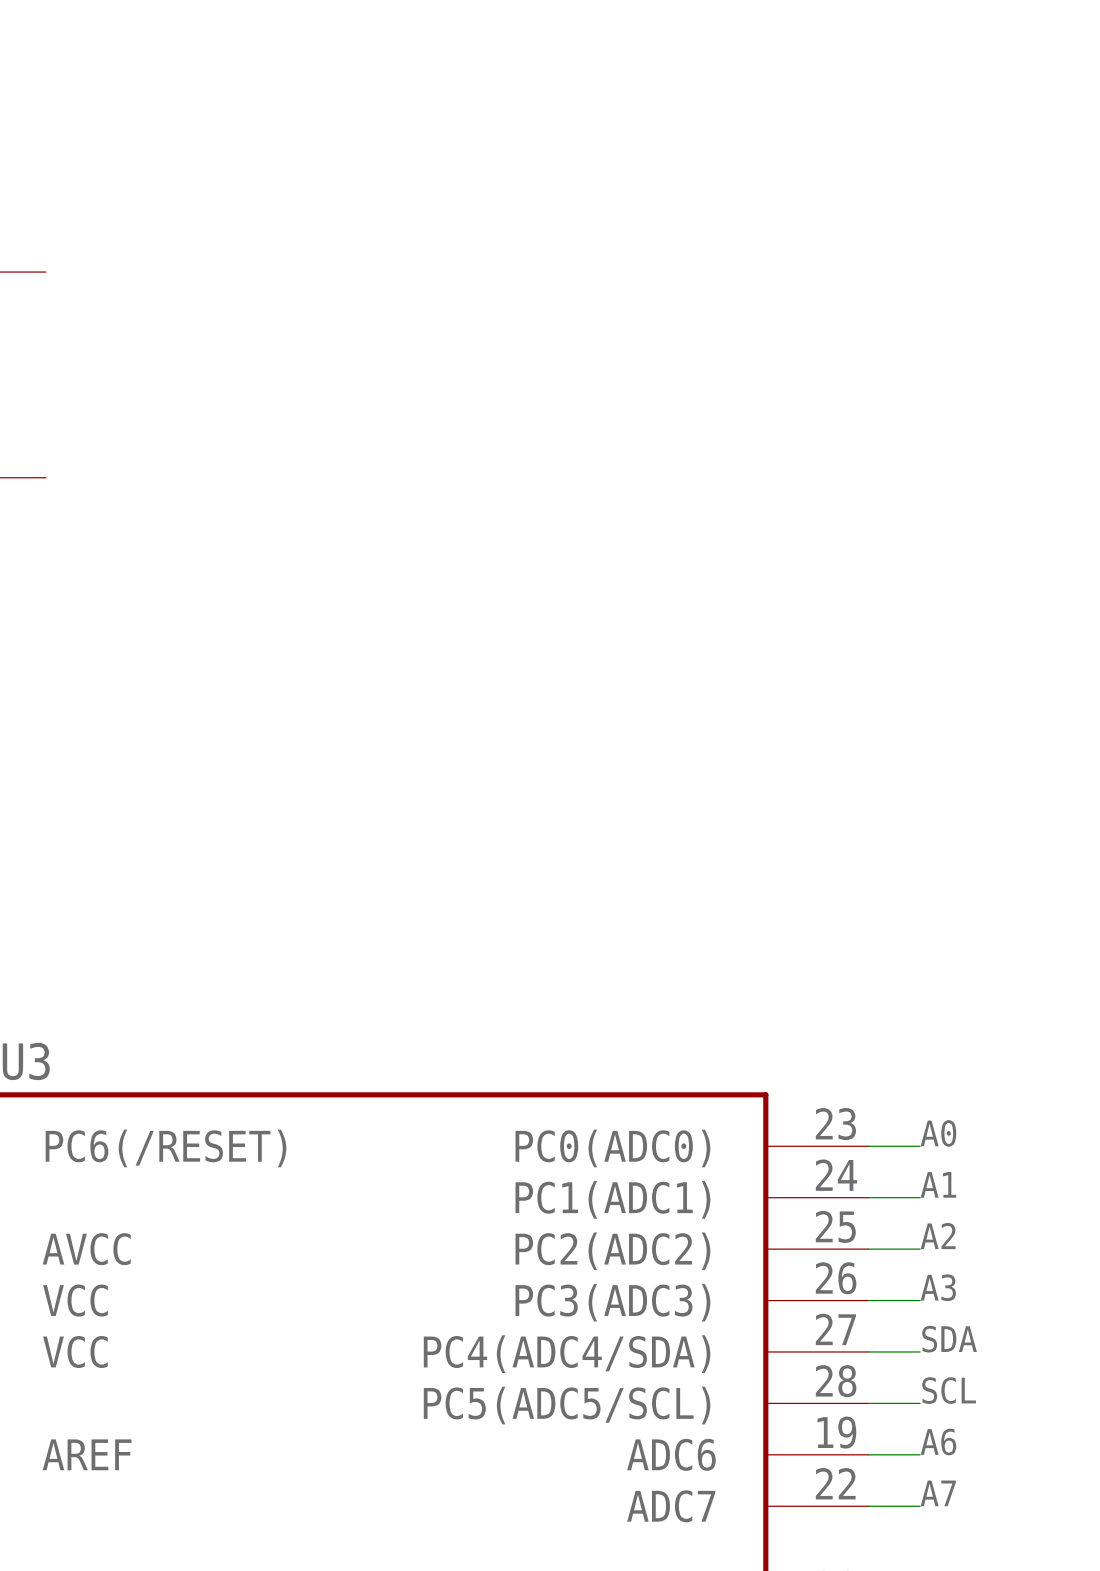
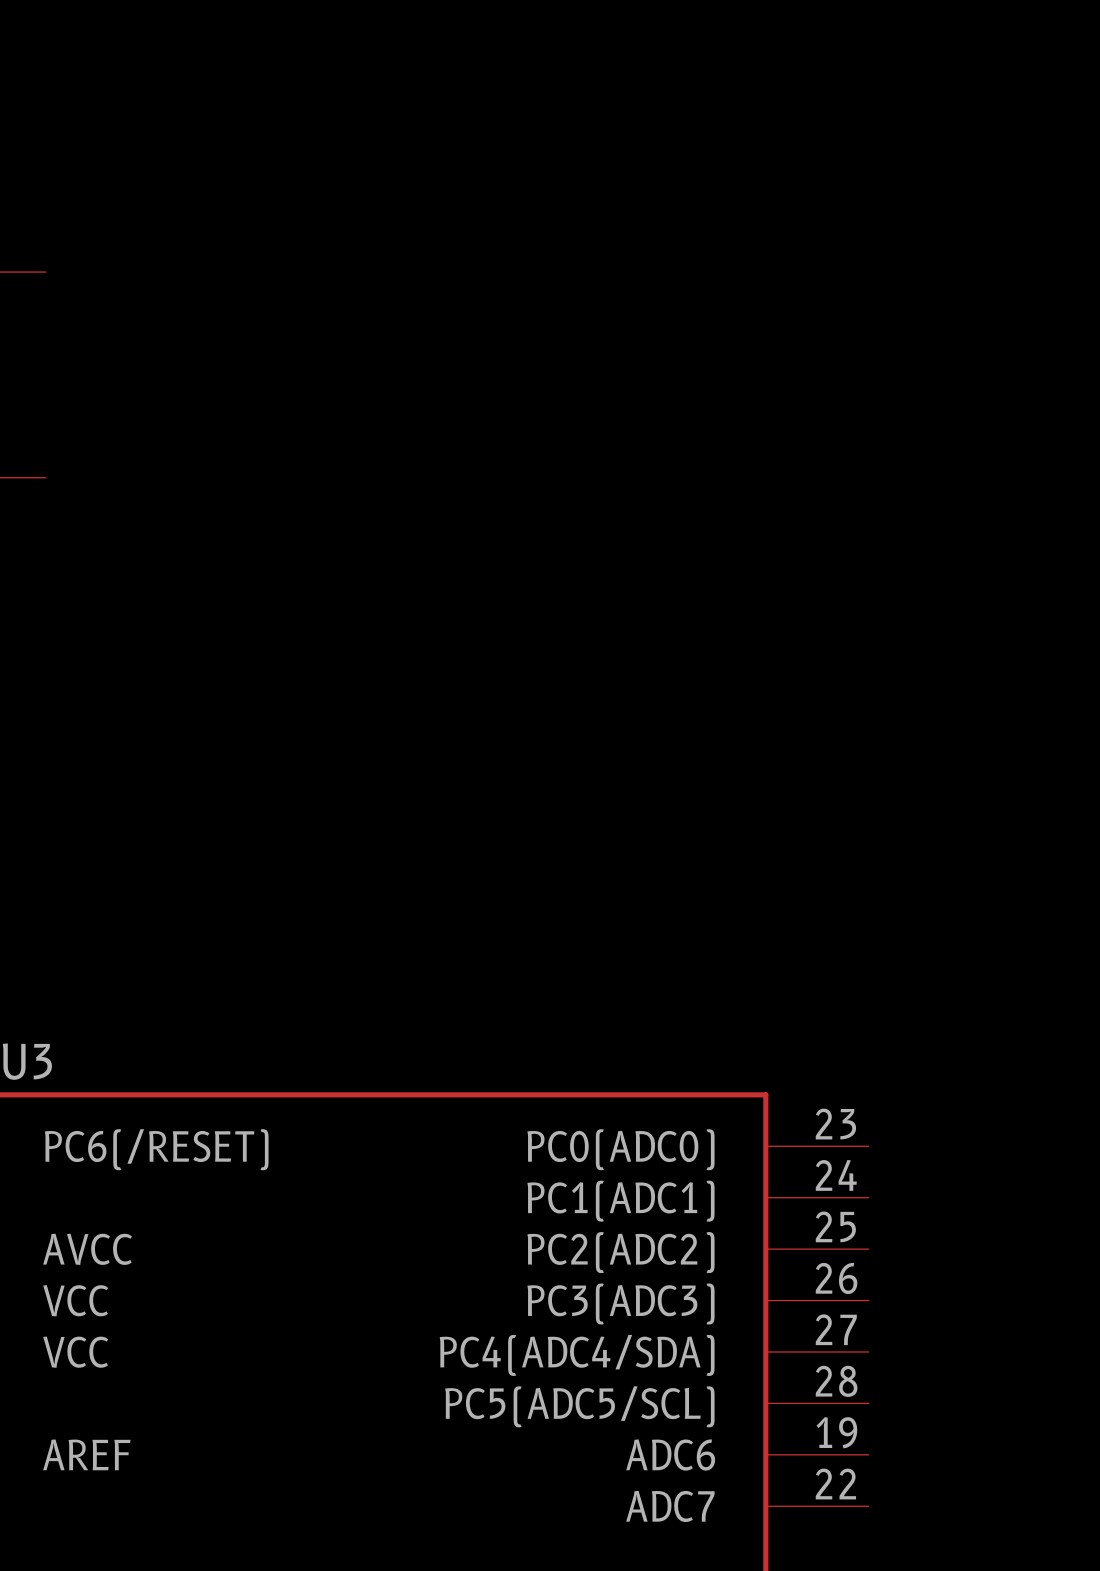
label: A0 (938, 1133) -> none
wire: (868, 1146) (920, 1146) -> none
label: A1 (938, 1184) -> none
wire: (868, 1197) (920, 1197) -> none
label: A2 (938, 1236) -> none
wire: (868, 1249) (920, 1249) -> none
label: A3 (938, 1287) -> none
wire: (868, 1300) (920, 1300) -> none
label: SDA (949, 1339) -> none
wire: (868, 1351) (920, 1351) -> none
label: SCL (949, 1390) -> none
wire: (868, 1403) (920, 1403) -> none
label: A6 (938, 1441) -> none
wire: (868, 1454) (920, 1454) -> none
label: A7 (938, 1493) -> none
wire: (868, 1506) (920, 1506) -> none

